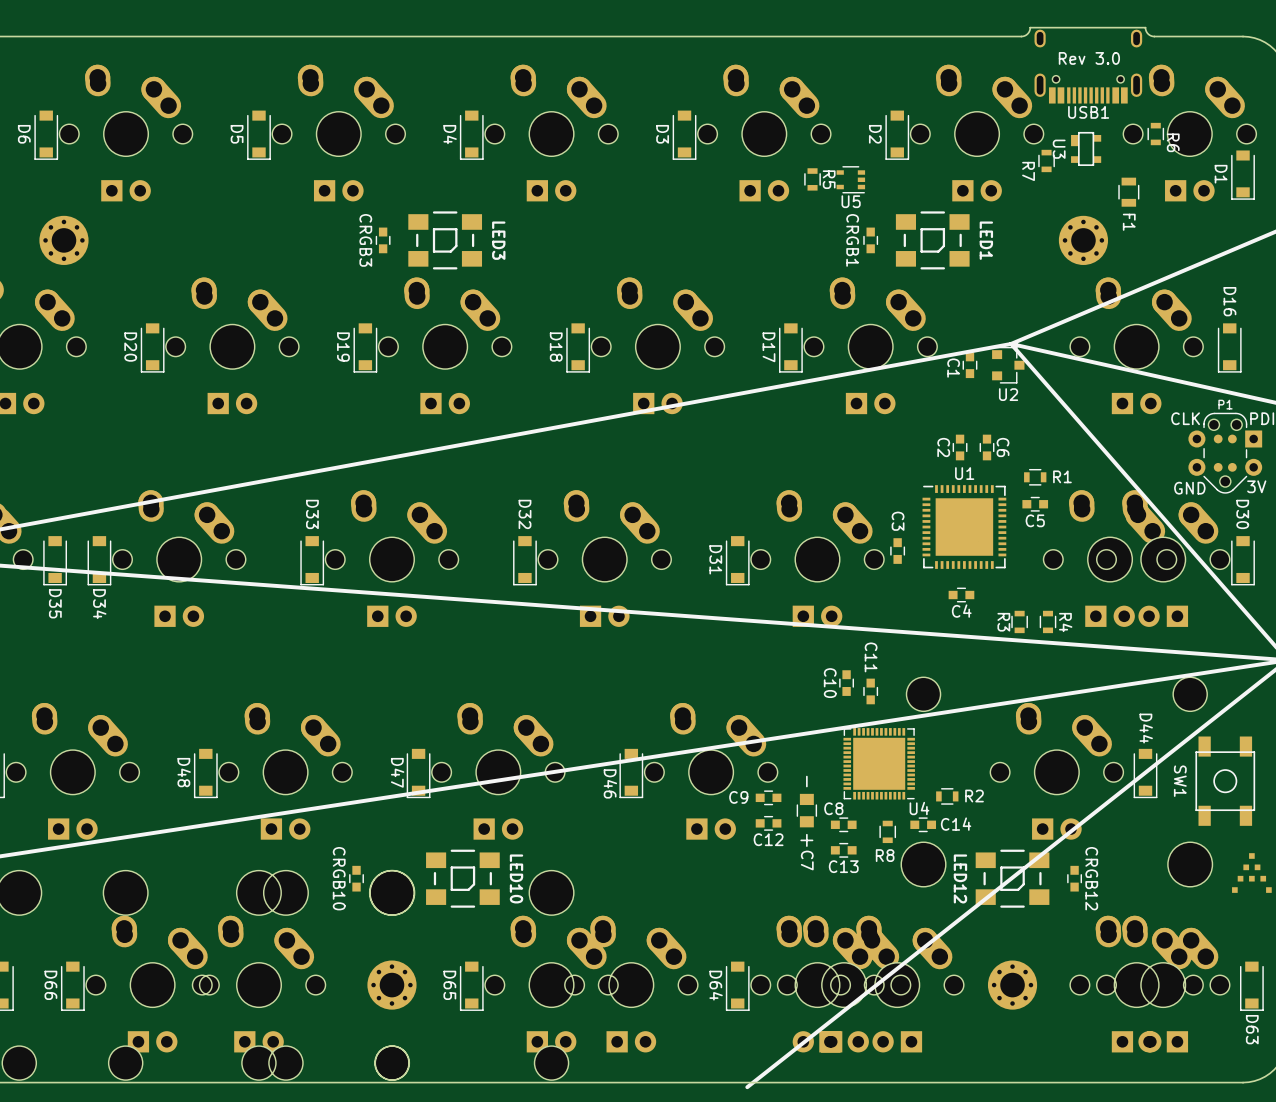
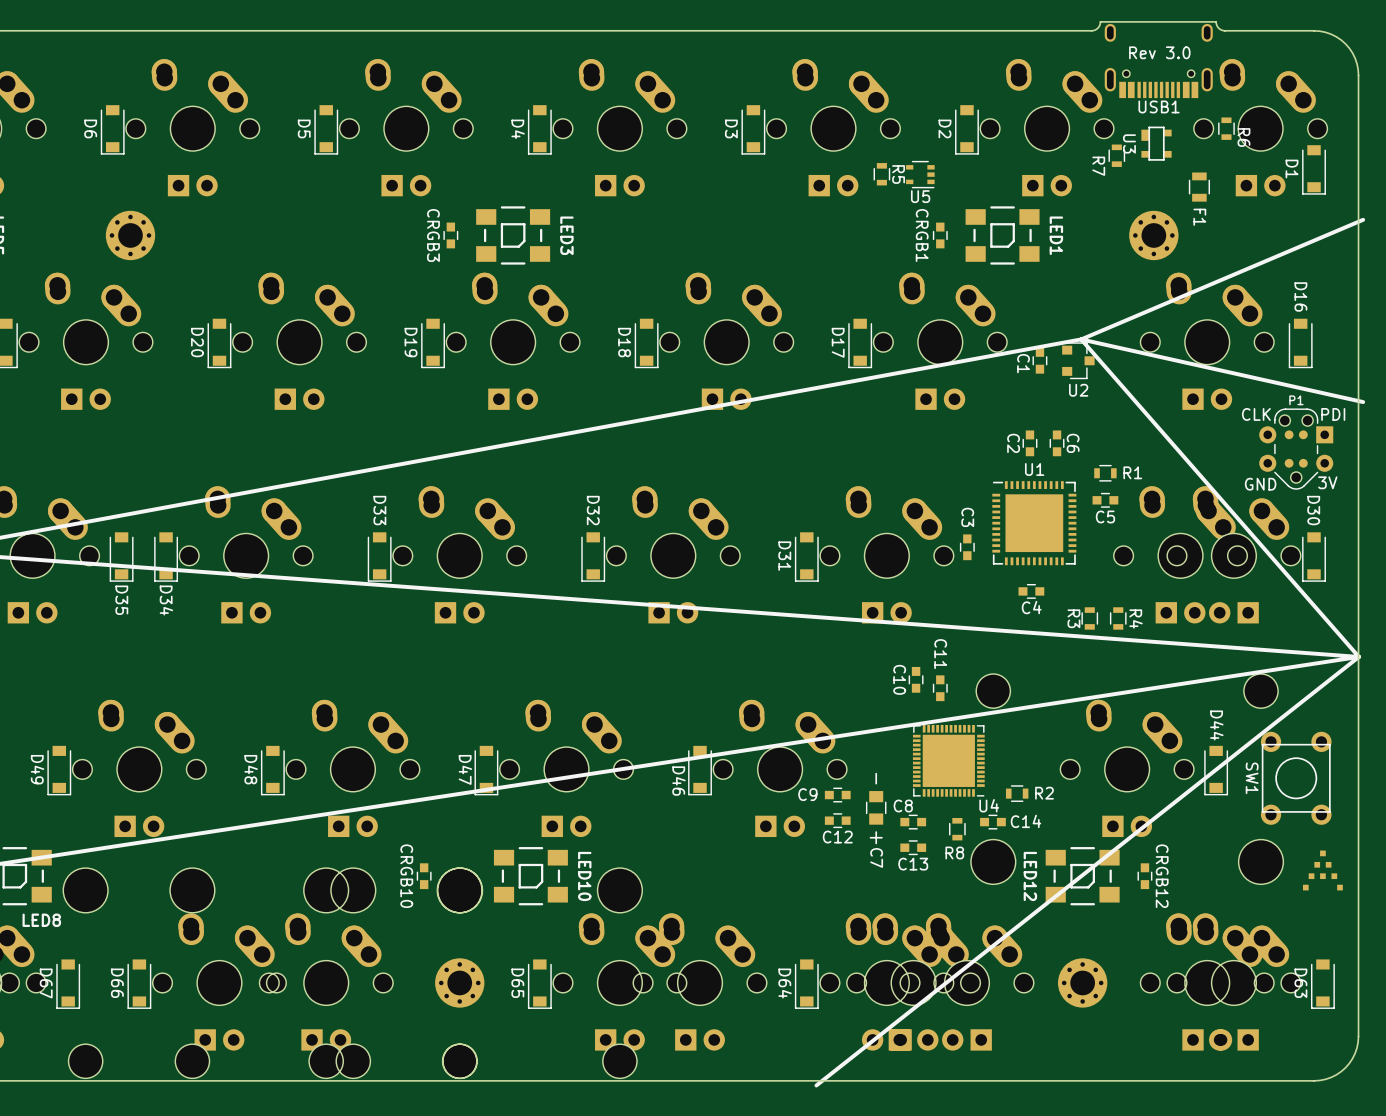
SW1 footprint: [1195, 736, 1256, 826] -> [1260, 731, 1332, 825]
D63 name position: D63 (1252, 1029) -> D63 (1300, 983)

